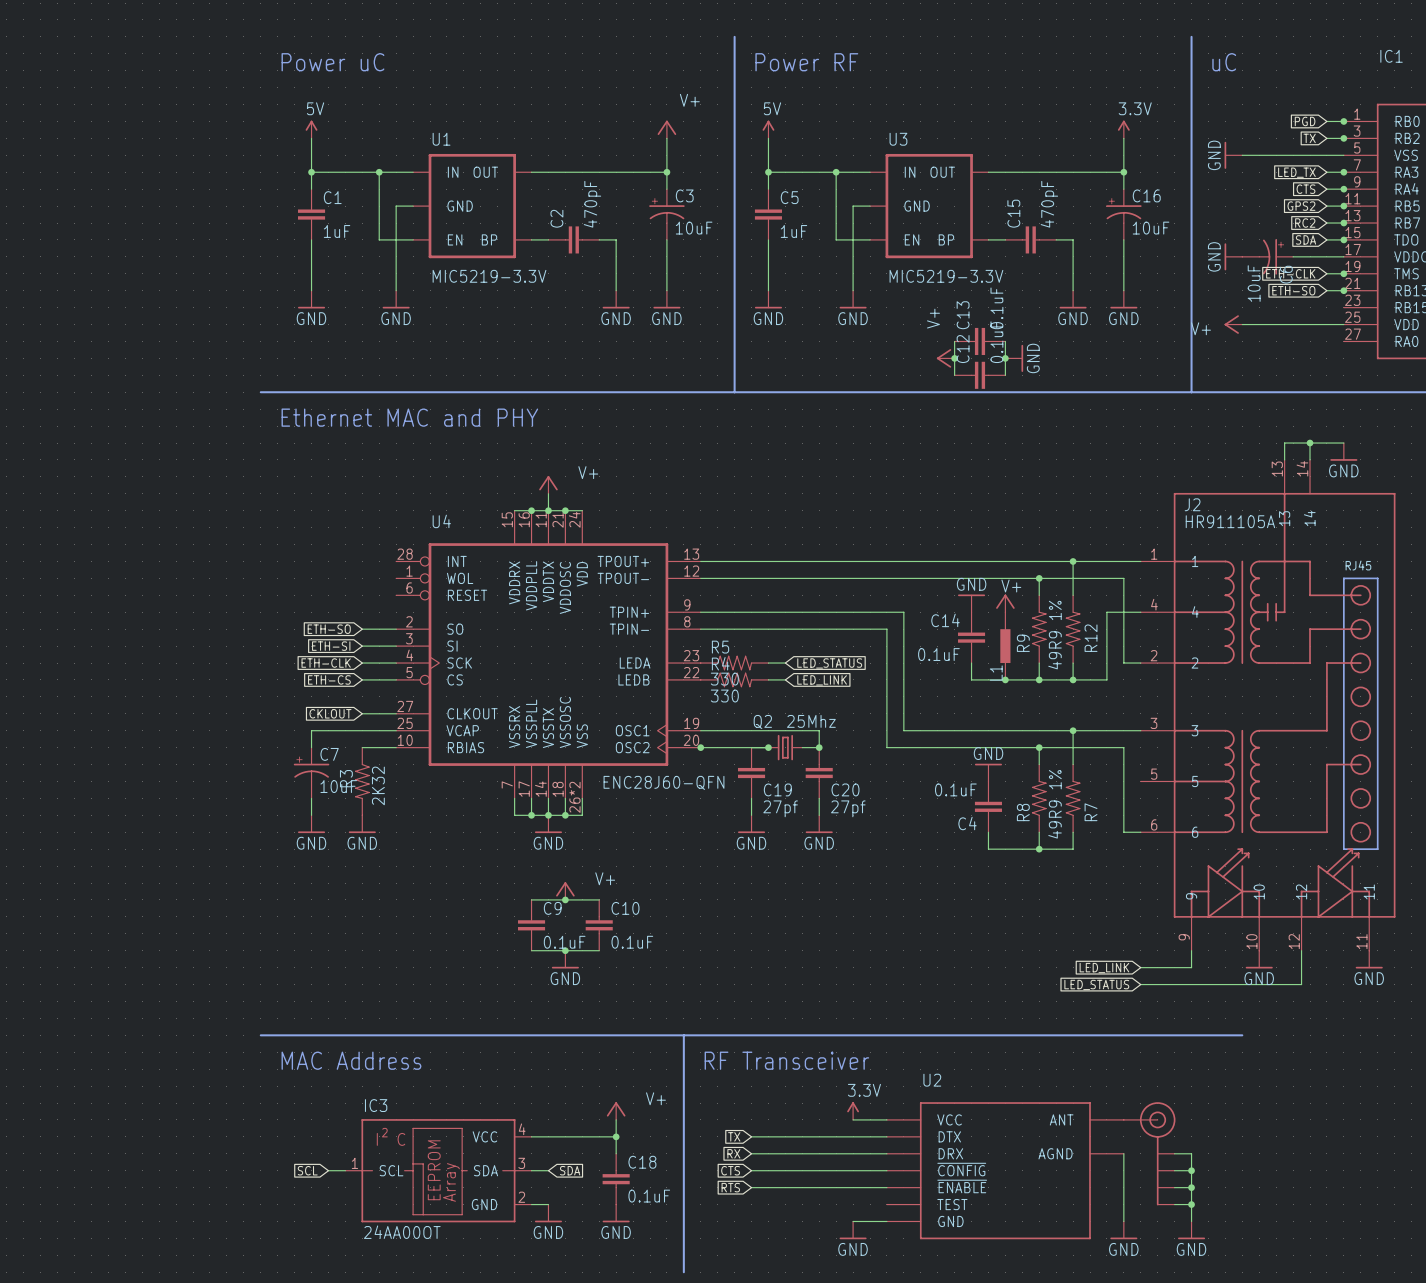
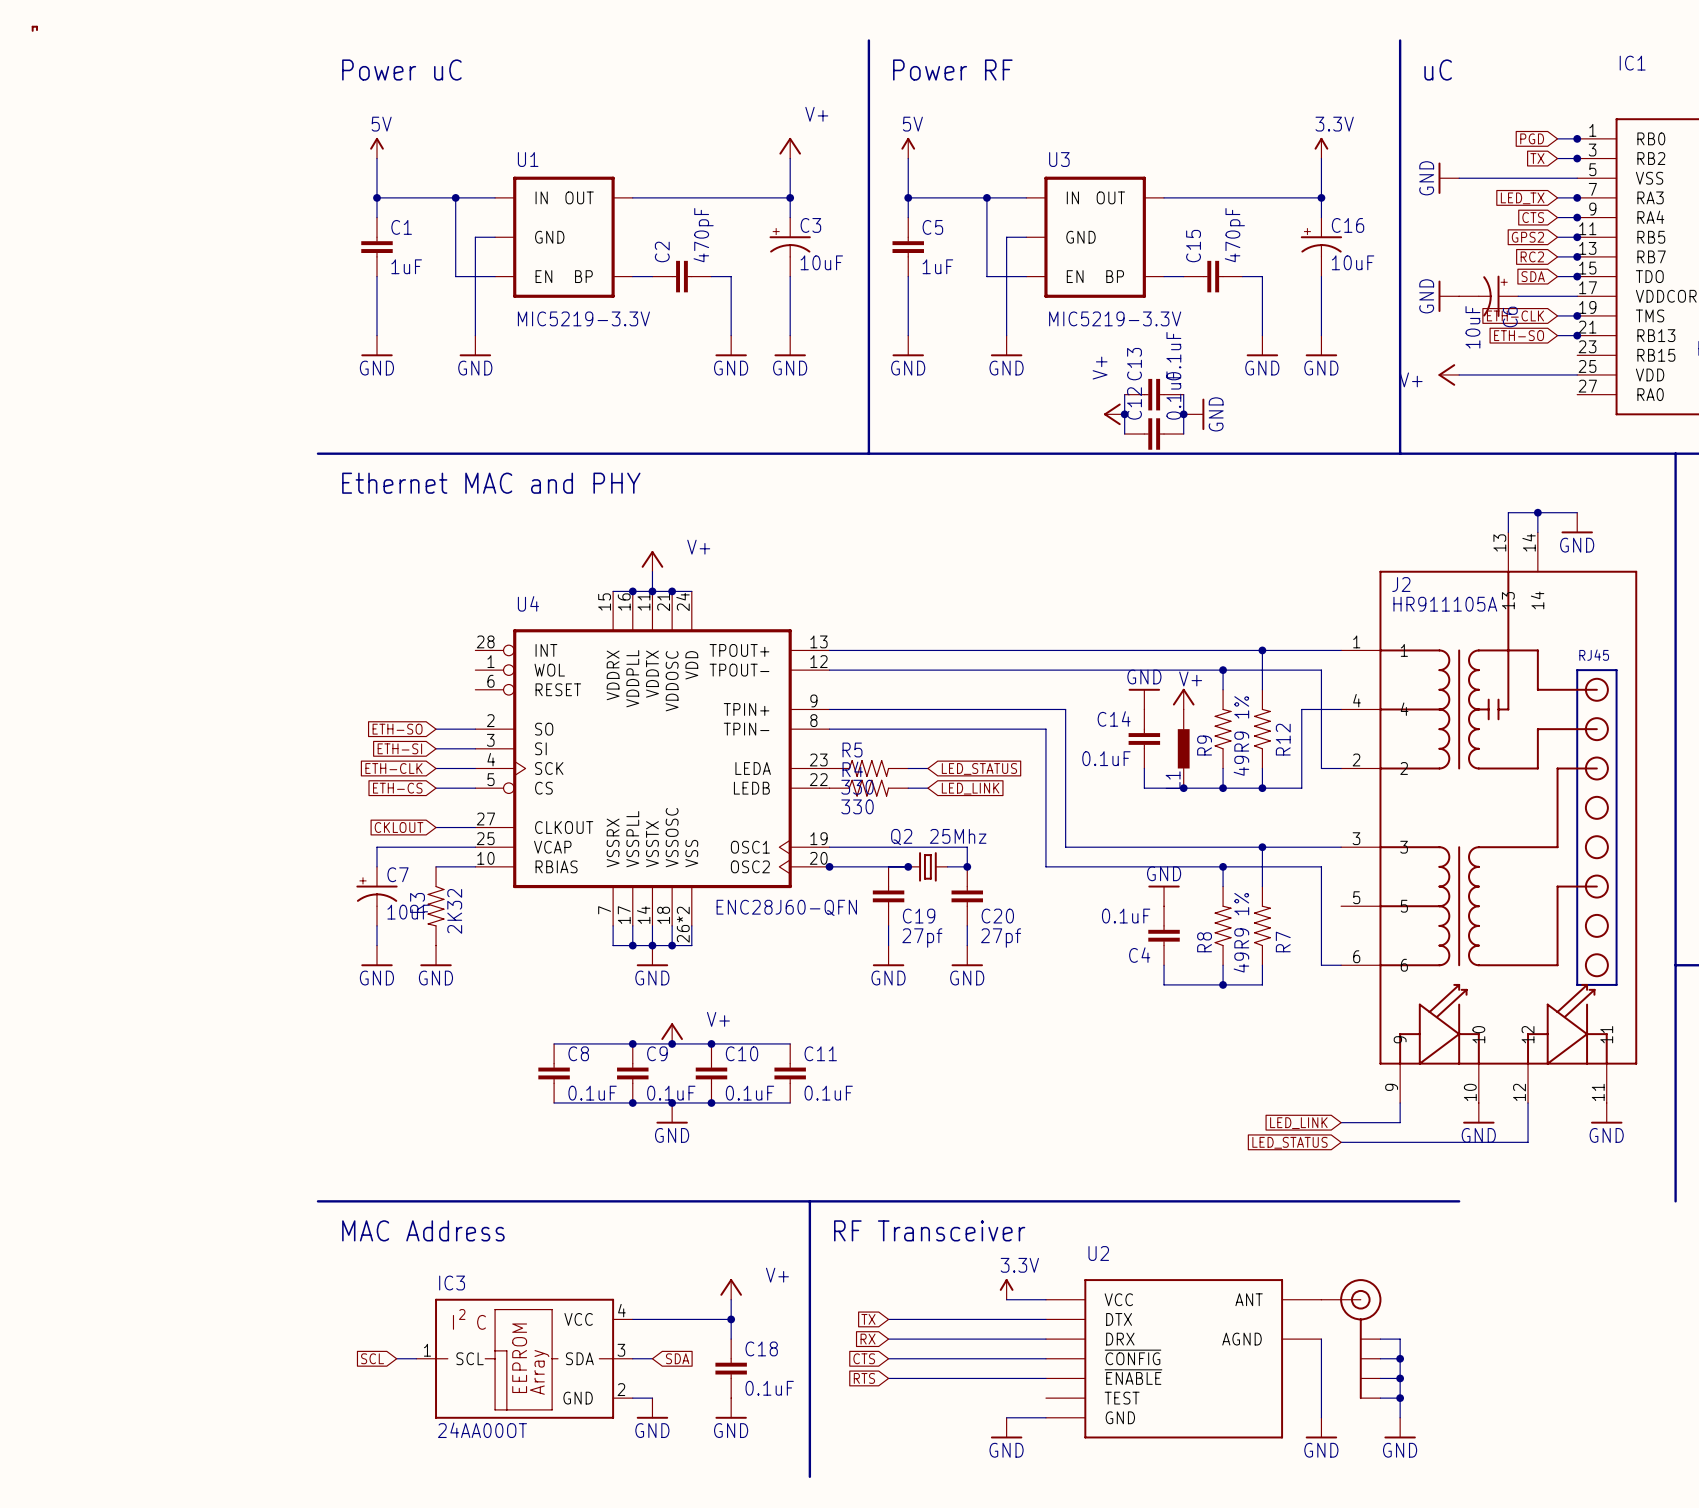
line: none -> (37, 30) (37, 26) (32, 26) (32, 30)
wire: none -> (554, 1043) (632, 1043)
junction: none -> (632, 1043)
wire: none -> (711, 1043) (790, 1043)
junction: none -> (711, 1043)
C8: none -> 0.1uF (554, 1073)
C11: none -> 0.1uF (790, 1073)
wire: none -> (554, 1102) (632, 1102)
junction: none -> (632, 1102)
wire: none -> (711, 1102) (790, 1102)
junction: none -> (711, 1102)

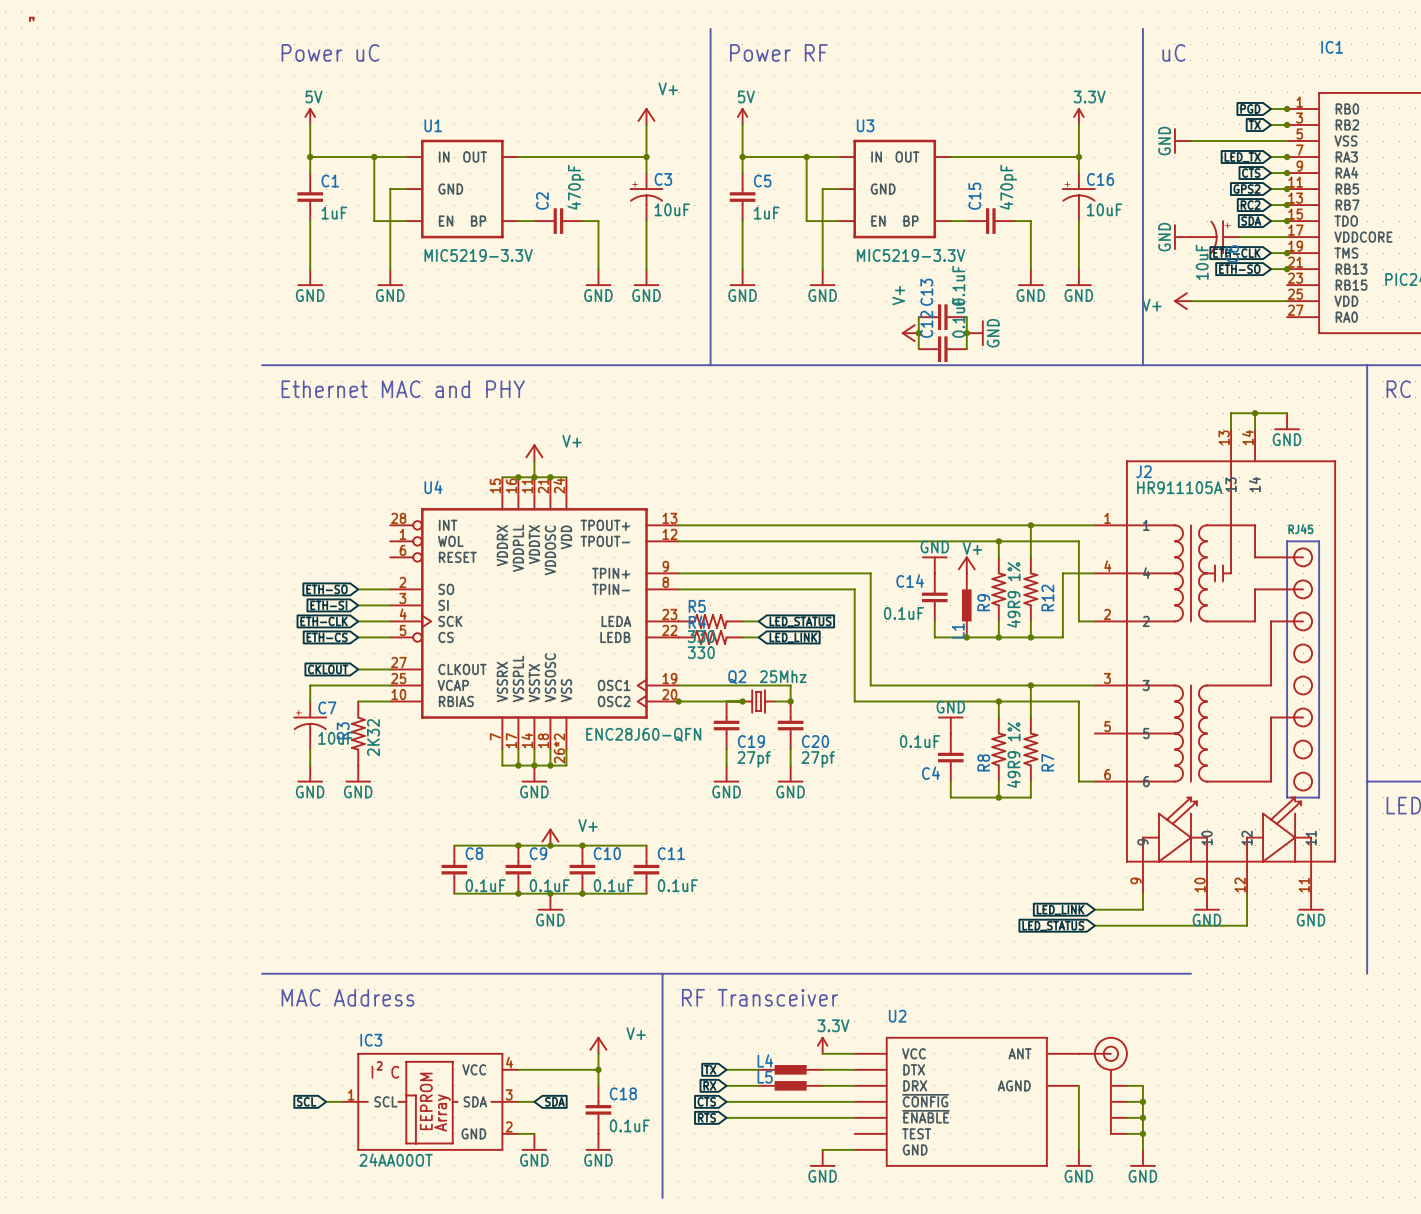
L4: none -> (790, 1069)
L5: none -> (790, 1085)

